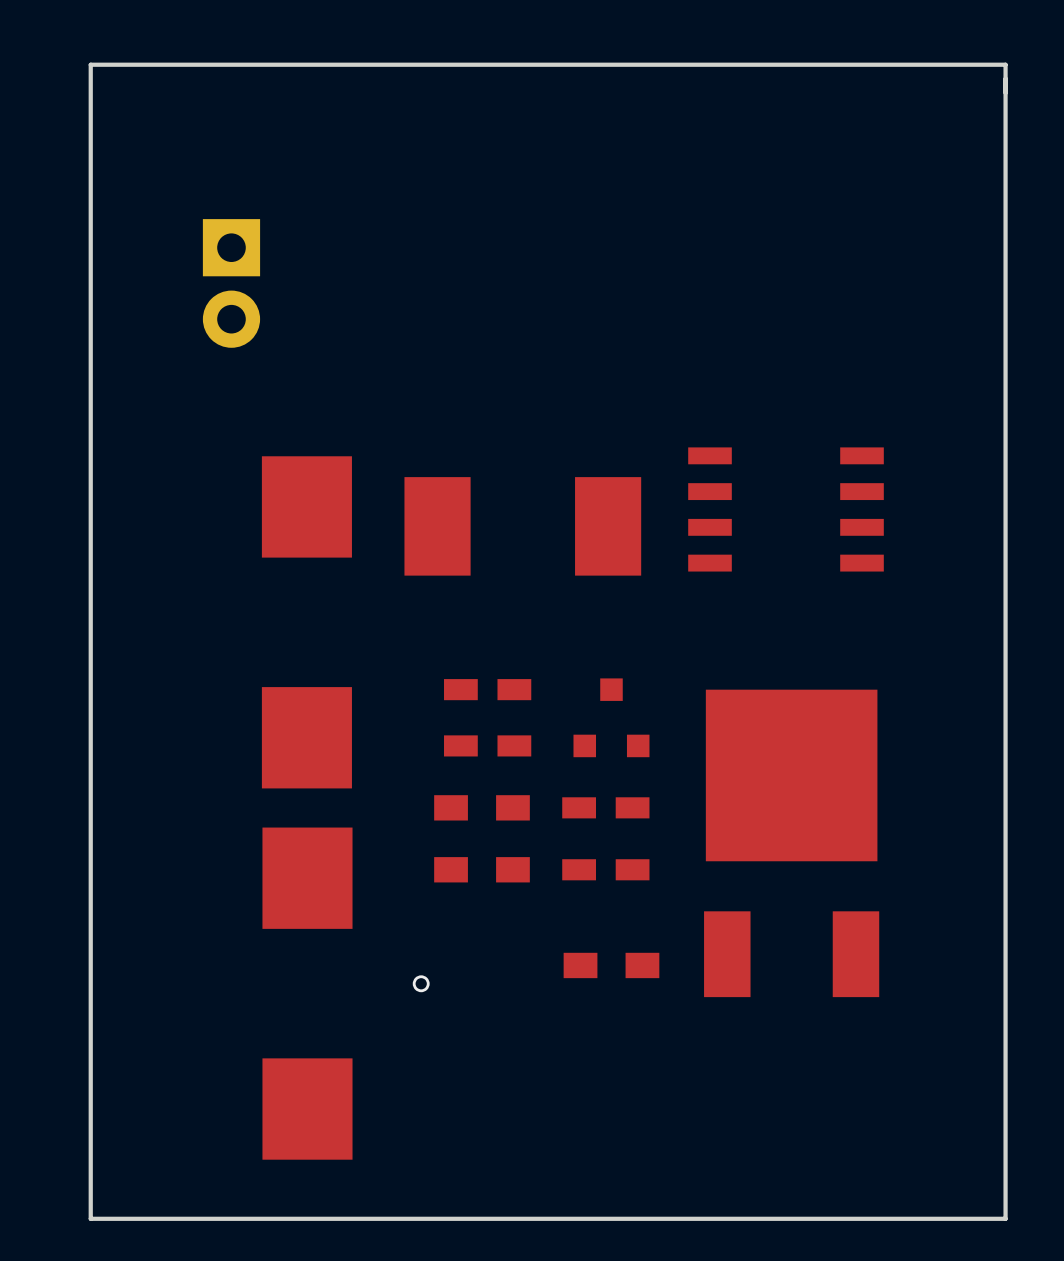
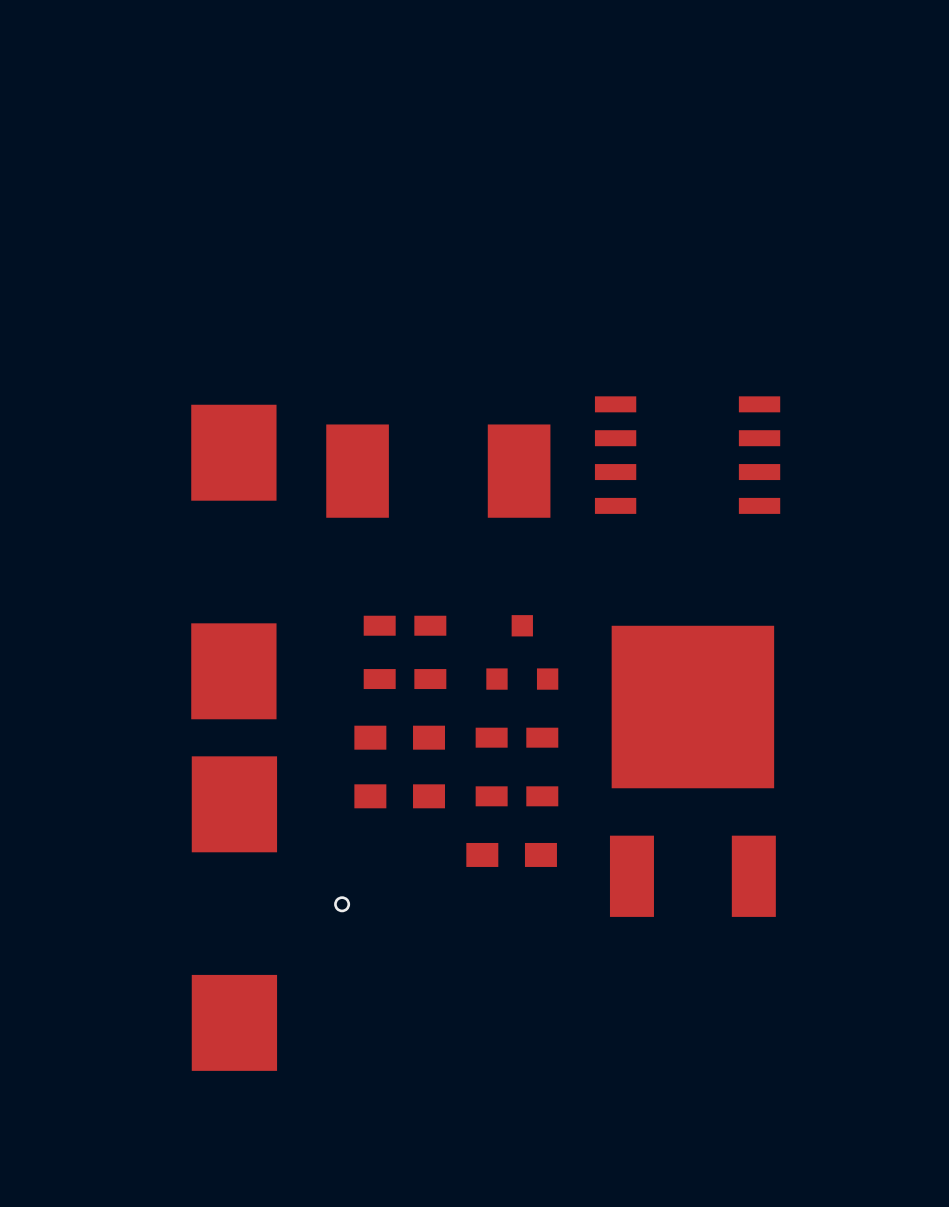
board edge: (1005, 64) (1005, 1218) (90, 1218) (90, 64) (1005, 64) -> none
part: (231, 283) -> none
part position: (611, 965) -> (511, 854)

